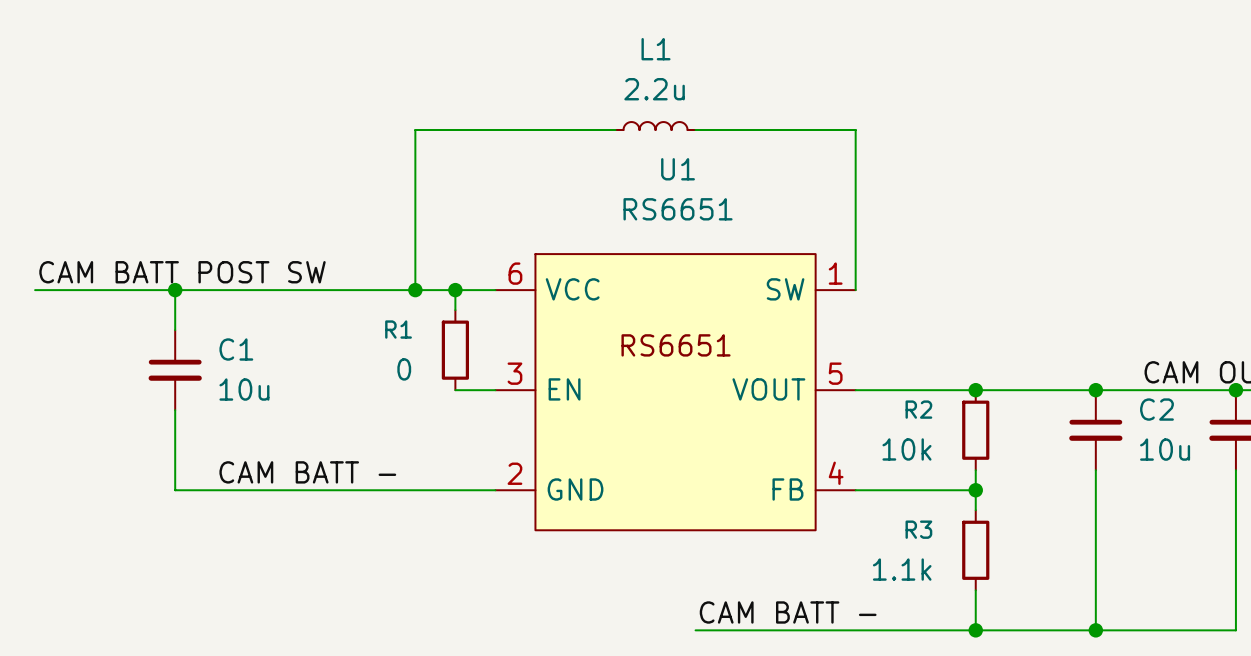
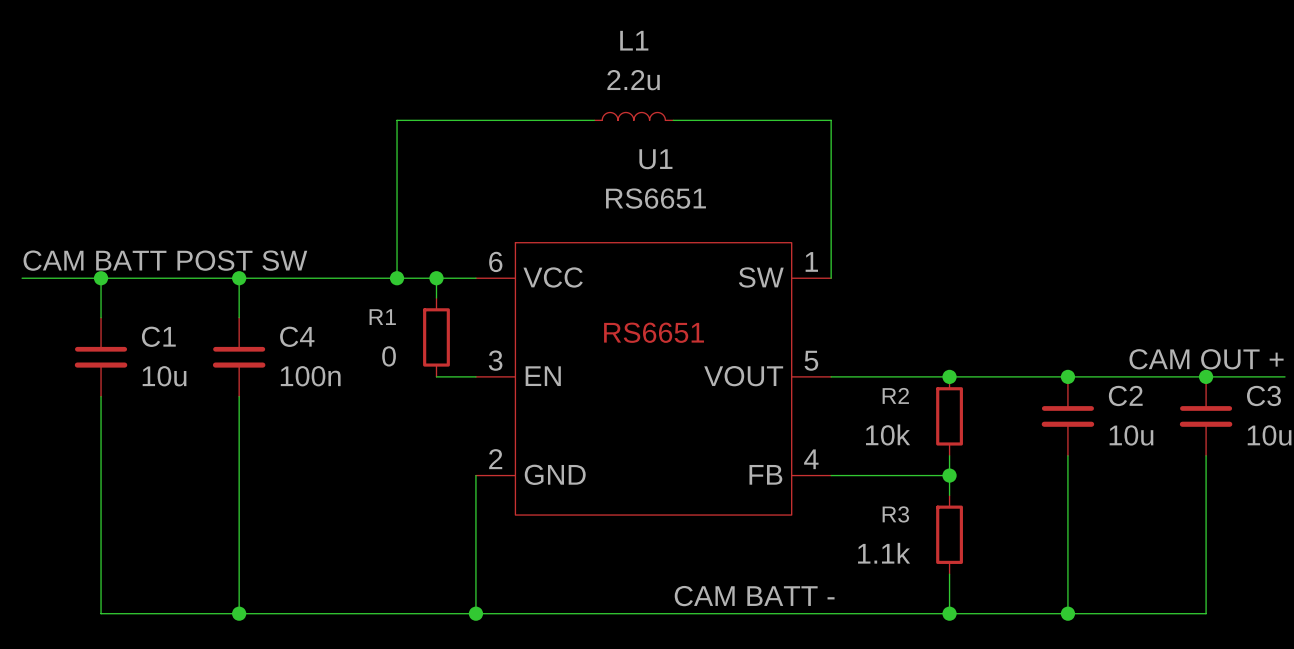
junction: none -> (101, 278)
wire: (175, 290) (175, 330) -> (101, 278) (101, 317)
junction: (175, 290) -> none
wire: none -> (239, 278) (239, 317)
junction: none -> (239, 278)
C1 position: (175, 370) -> (101, 357)
C4: none -> 100n (239, 357)
wire: none -> (101, 396) (101, 613) (673, 613)
wire: (175, 410) (175, 490) (495, 490) -> (475, 613) (475, 475)
wire: none -> (239, 396) (239, 613)
label: CAM BATT - (307, 472) -> none
junction: none -> (239, 613)
junction: none -> (475, 613)

